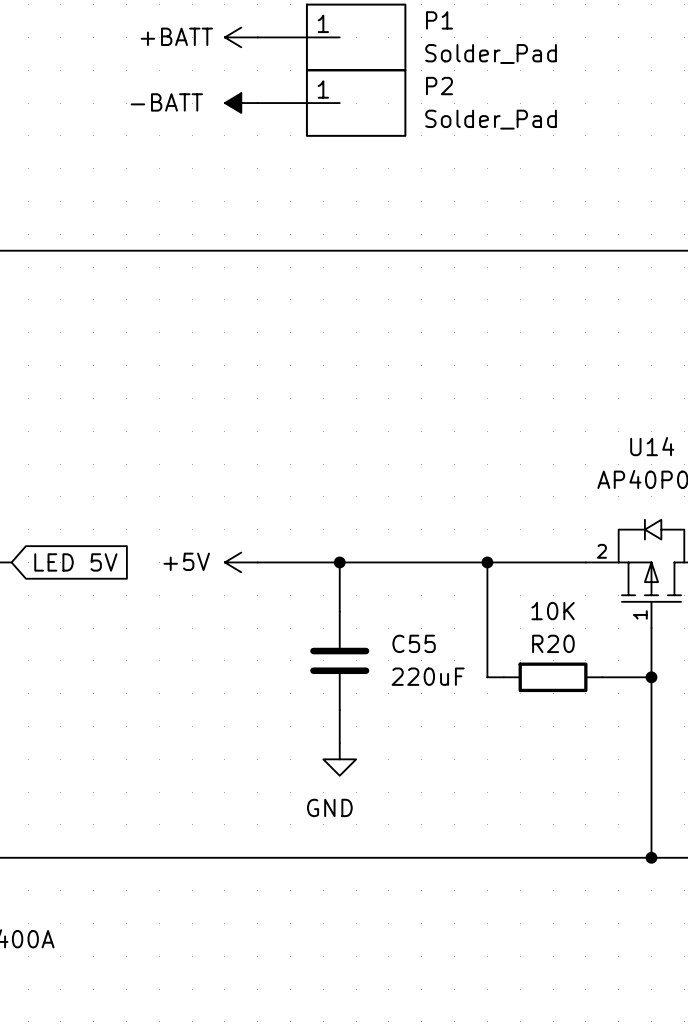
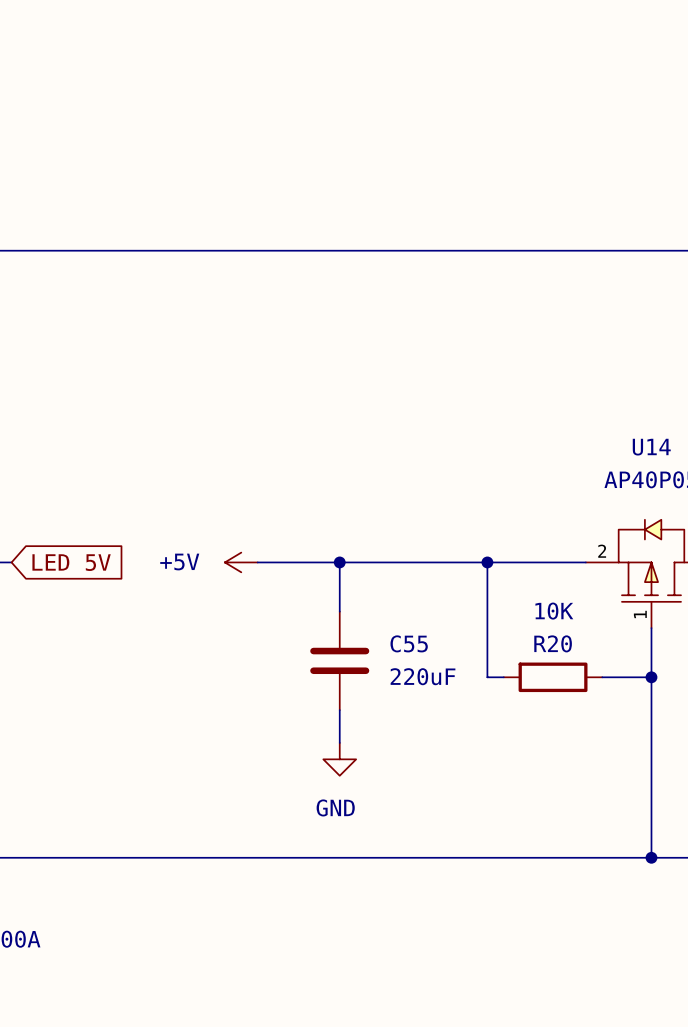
power symbol: +BATT (241, 37) -> none
wire: (257, 37) (306, 37) -> none
P1: Solder_Pad (356, 37) -> none
power symbol: -BATT (241, 103) -> none
wire: (257, 103) (306, 103) -> none
P2: Solder_Pad (356, 103) -> none

